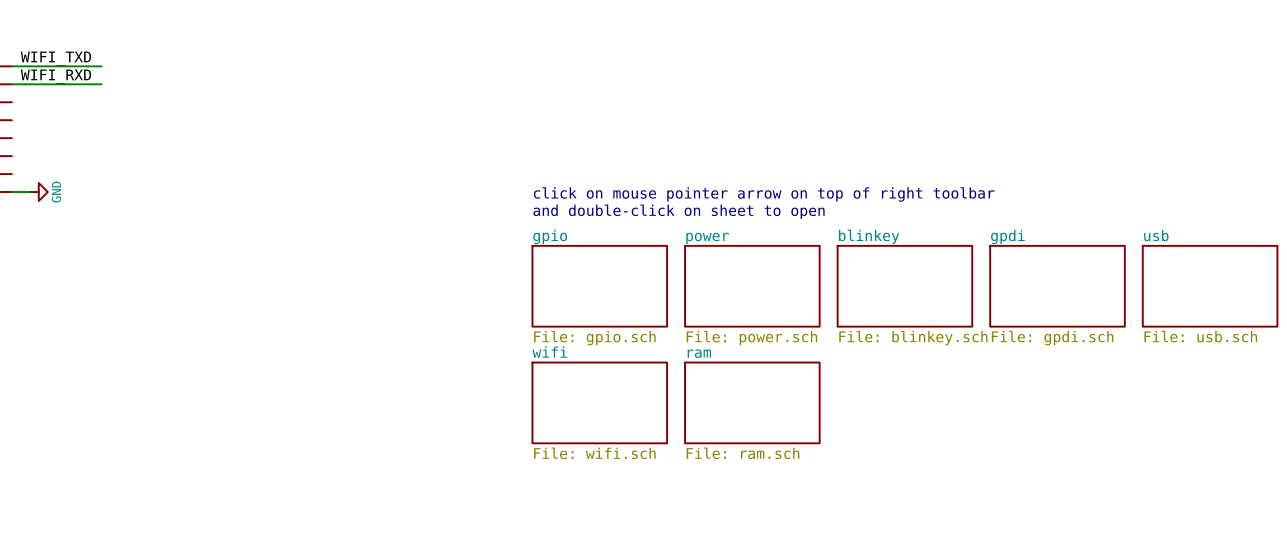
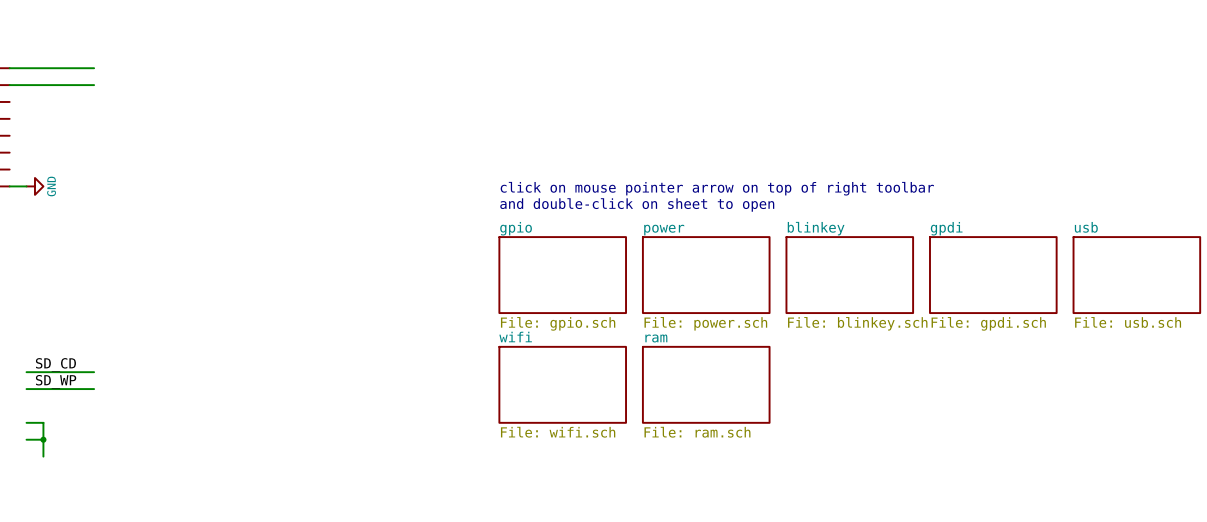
label: WIFI_TXD (55, 58) -> none
label: WIFI_RXD (55, 76) -> none
label: none -> SD_CD (55, 364)
wire: none -> (26, 372) (94, 372)
label: none -> SD_WP (56, 381)
wire: none -> (26, 389) (94, 389)
wire: none -> (26, 422) (43, 422) (43, 456)
wire: none -> (26, 439) (43, 439)
junction: none -> (43, 439)

